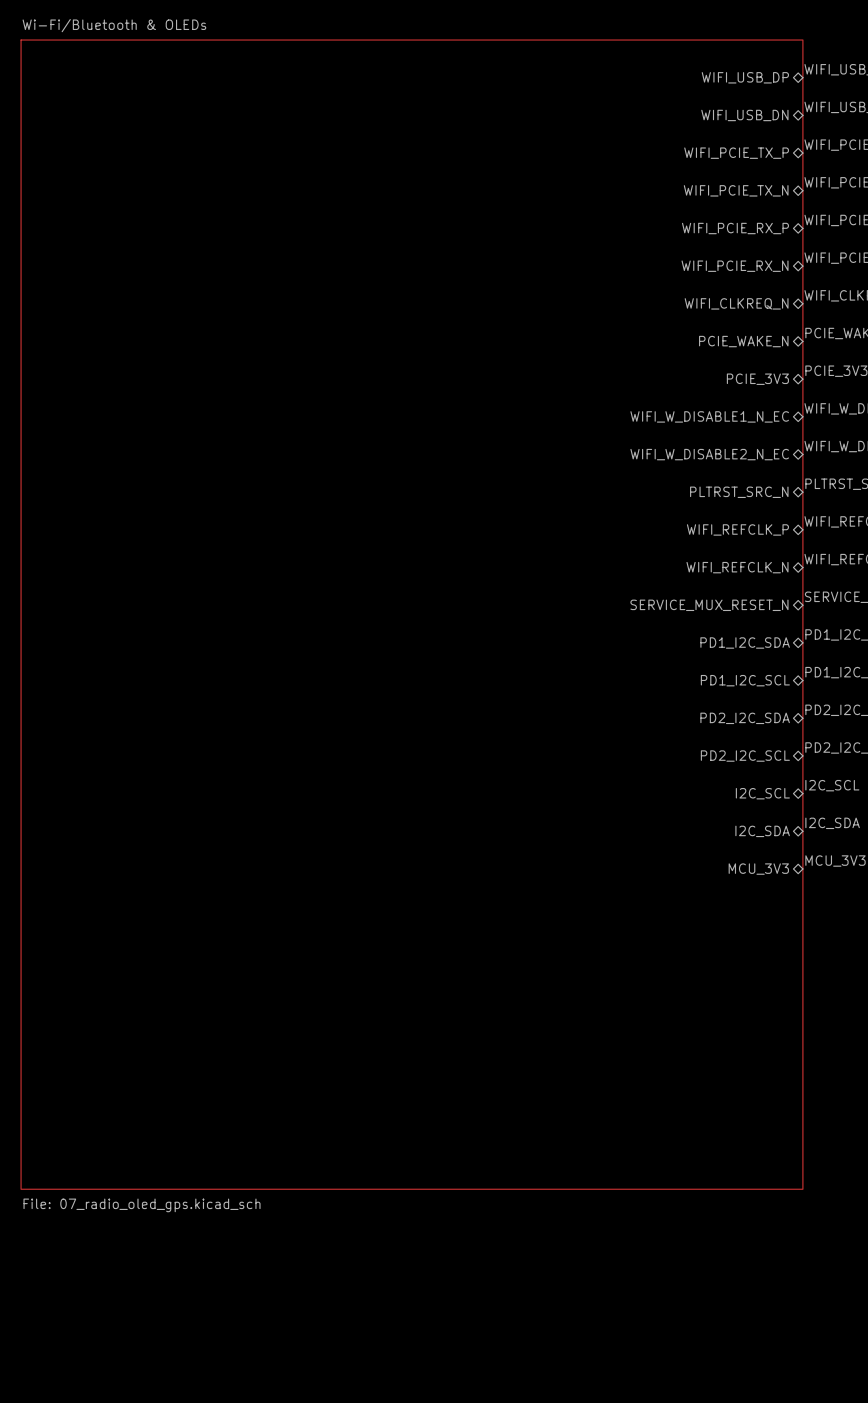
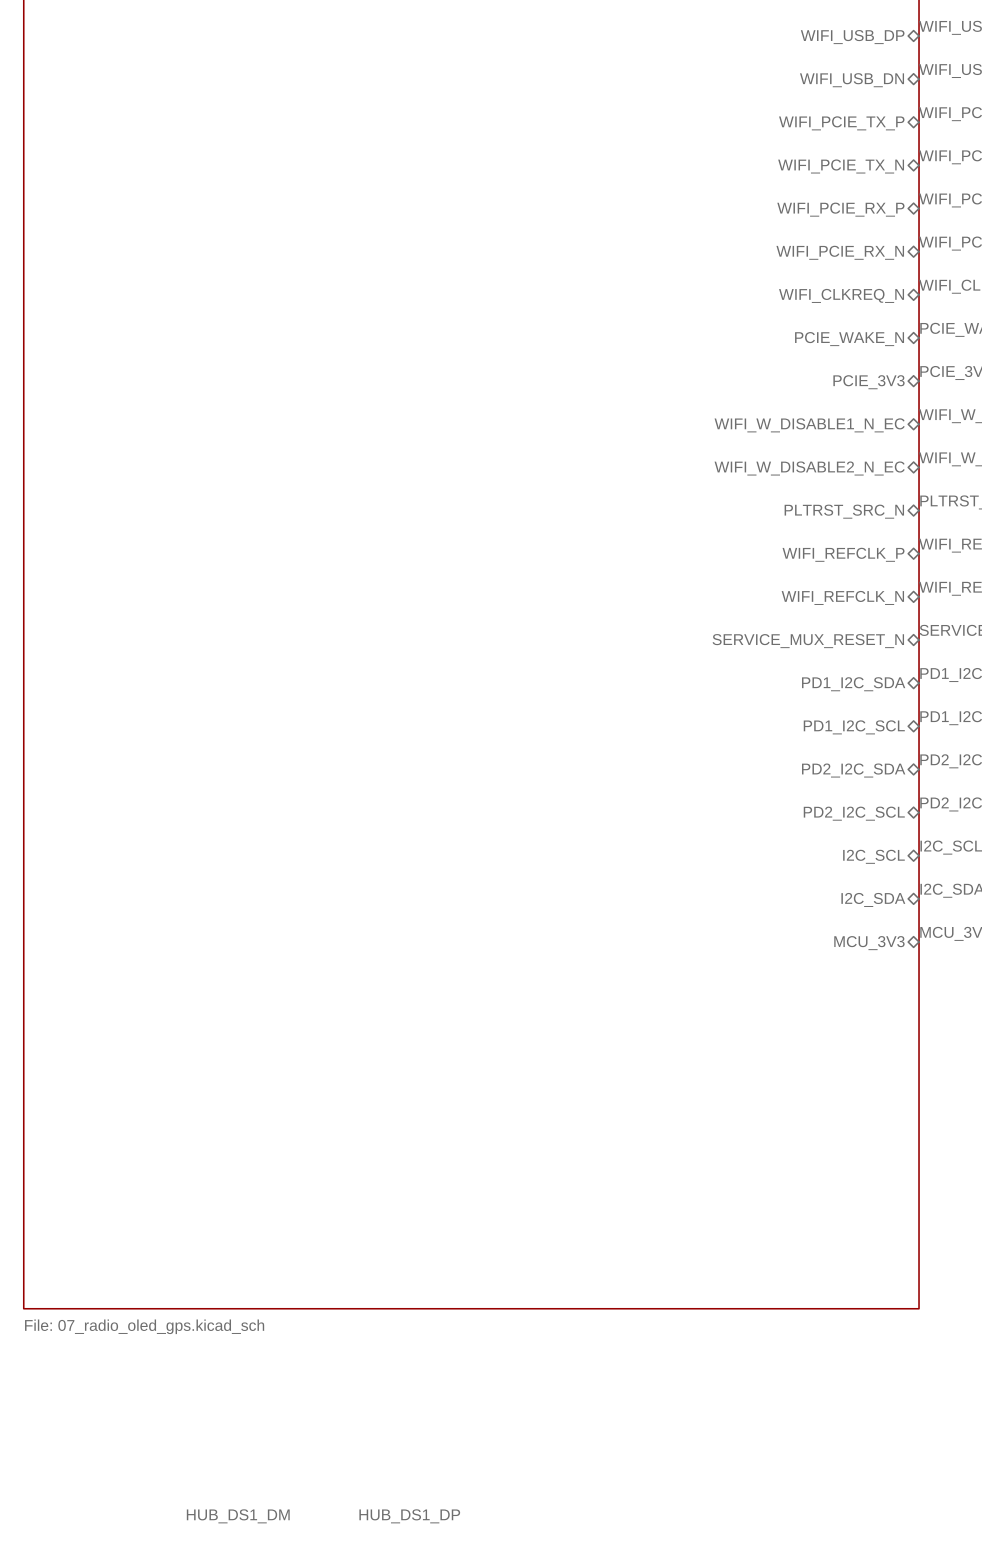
label: none -> HUB_DS1_DM (238, 1516)
label: none -> HUB_DS1_DP (409, 1516)

